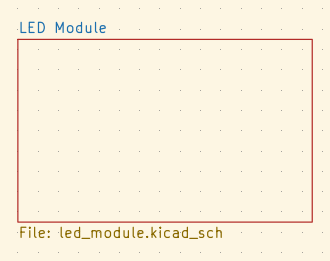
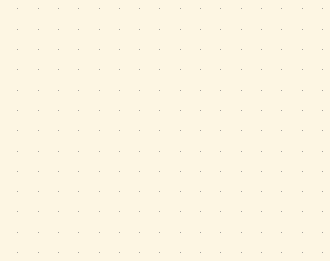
sheet LED Module: File: led_module.kicad_sch (165, 130) -> none

